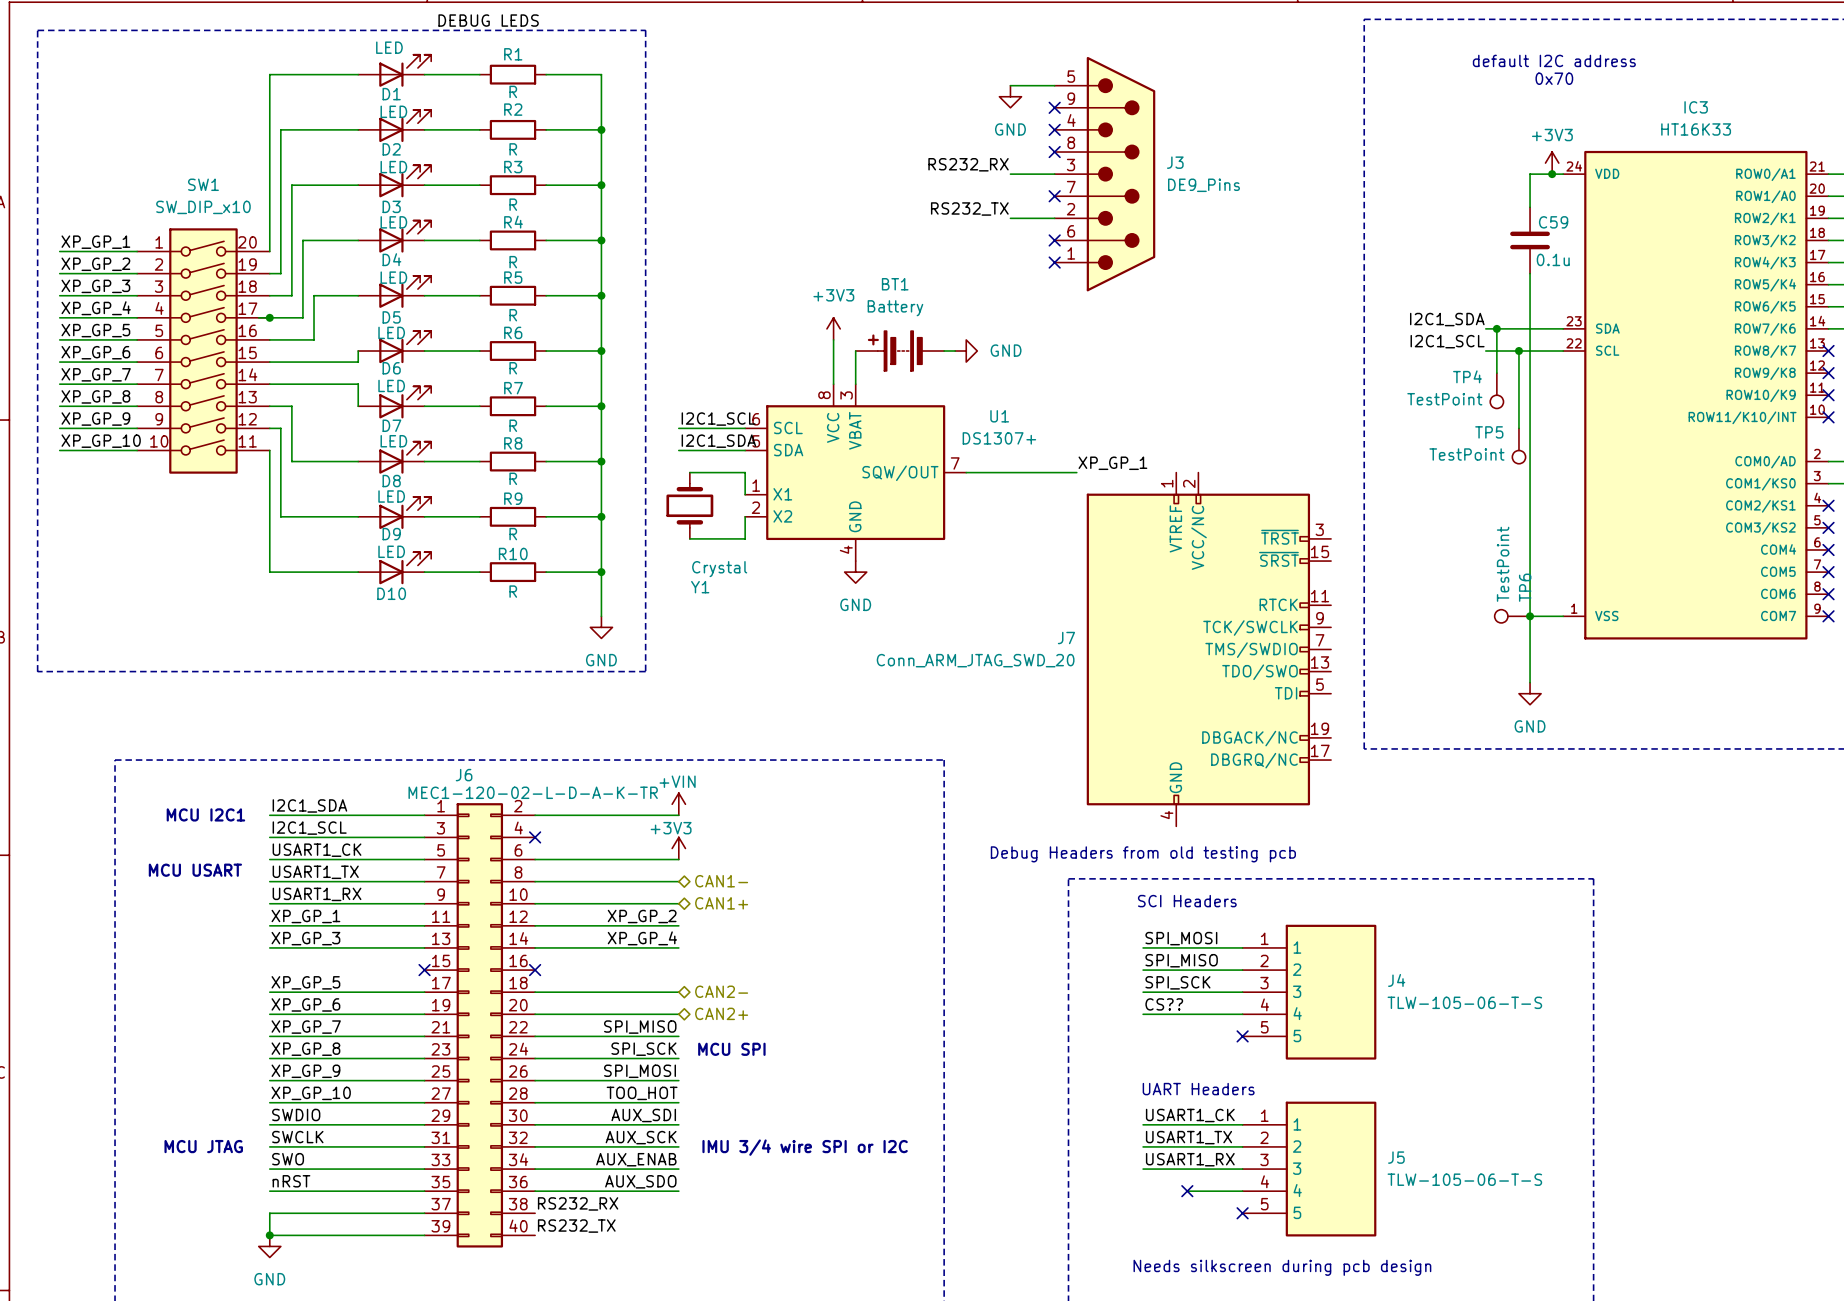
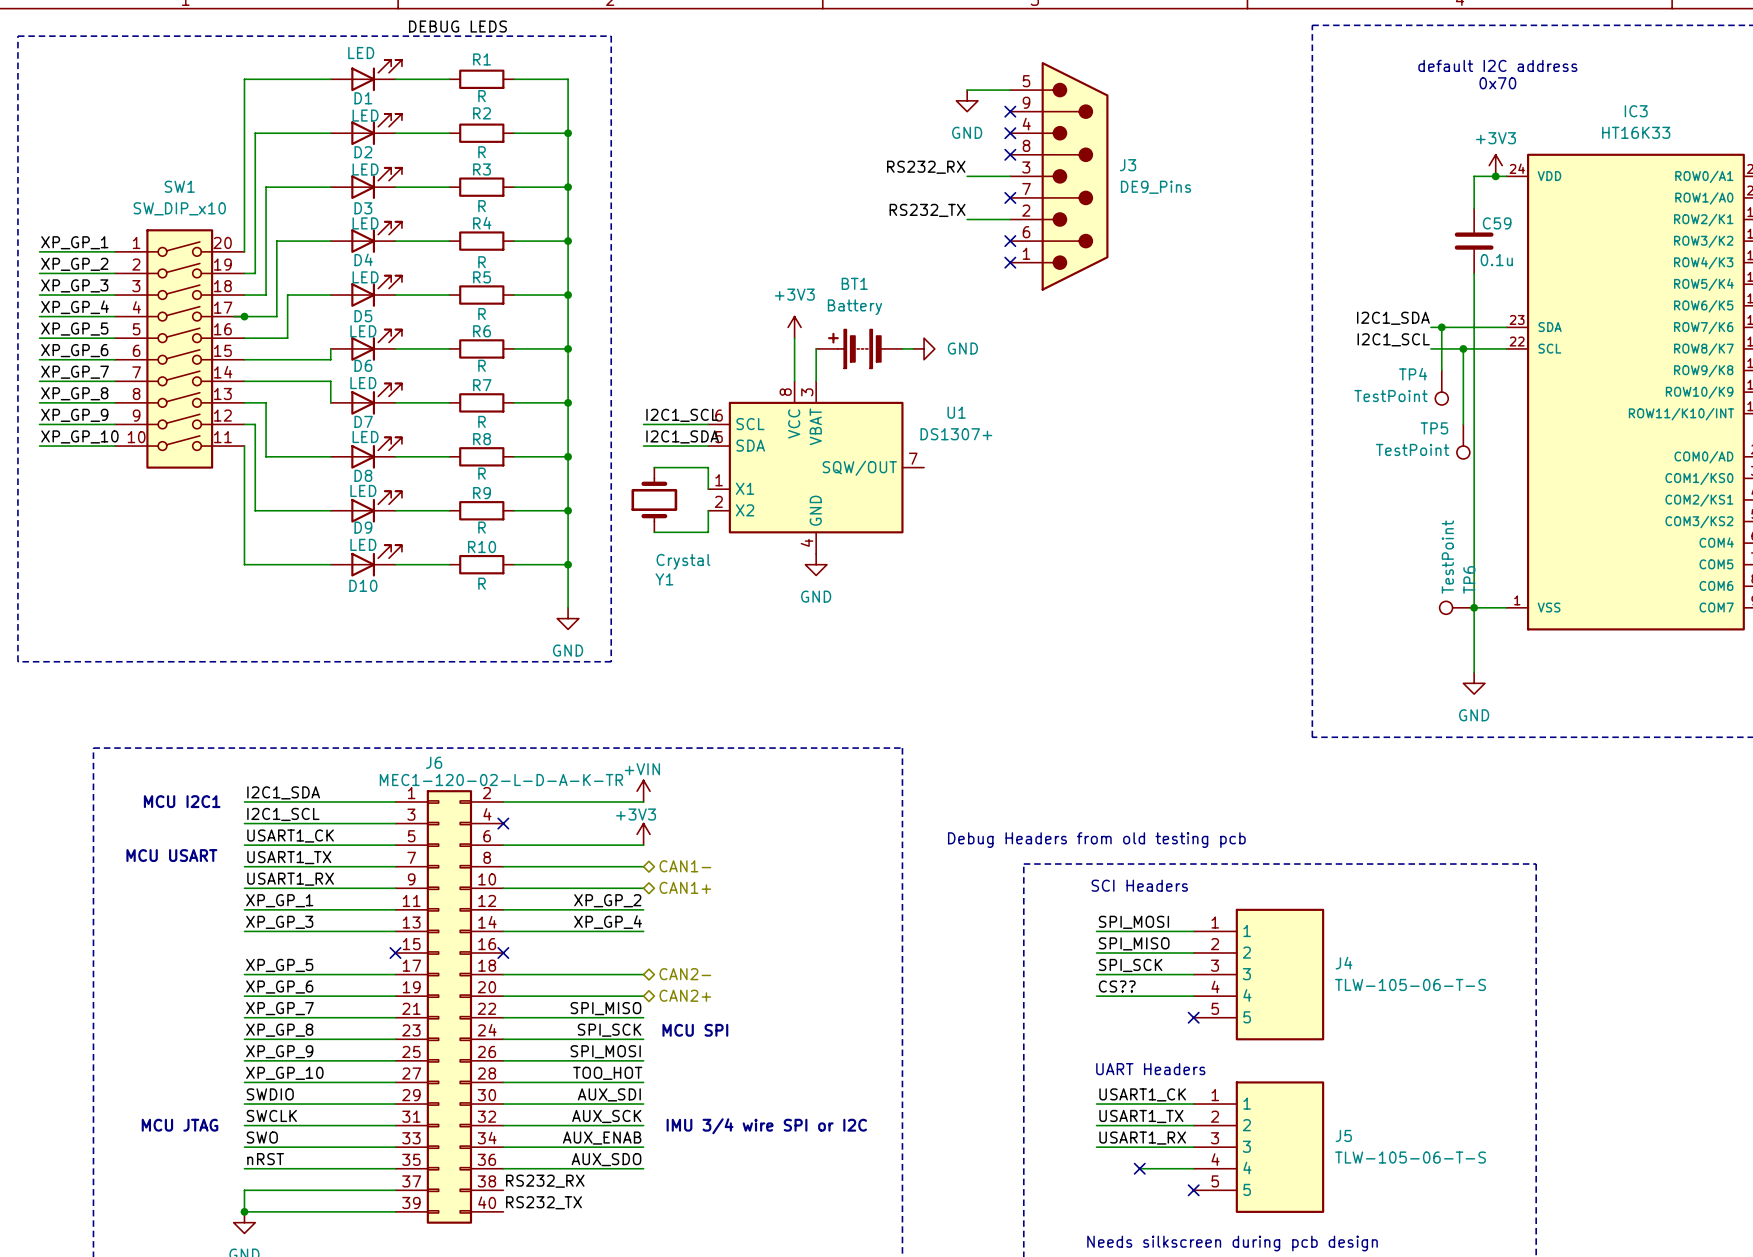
label: XP_GP_1 (1112, 463) -> none
wire: (966, 472) (1076, 472) -> none
J7: Conn_ARM_JTAG_SWD_20 (1208, 649) -> none

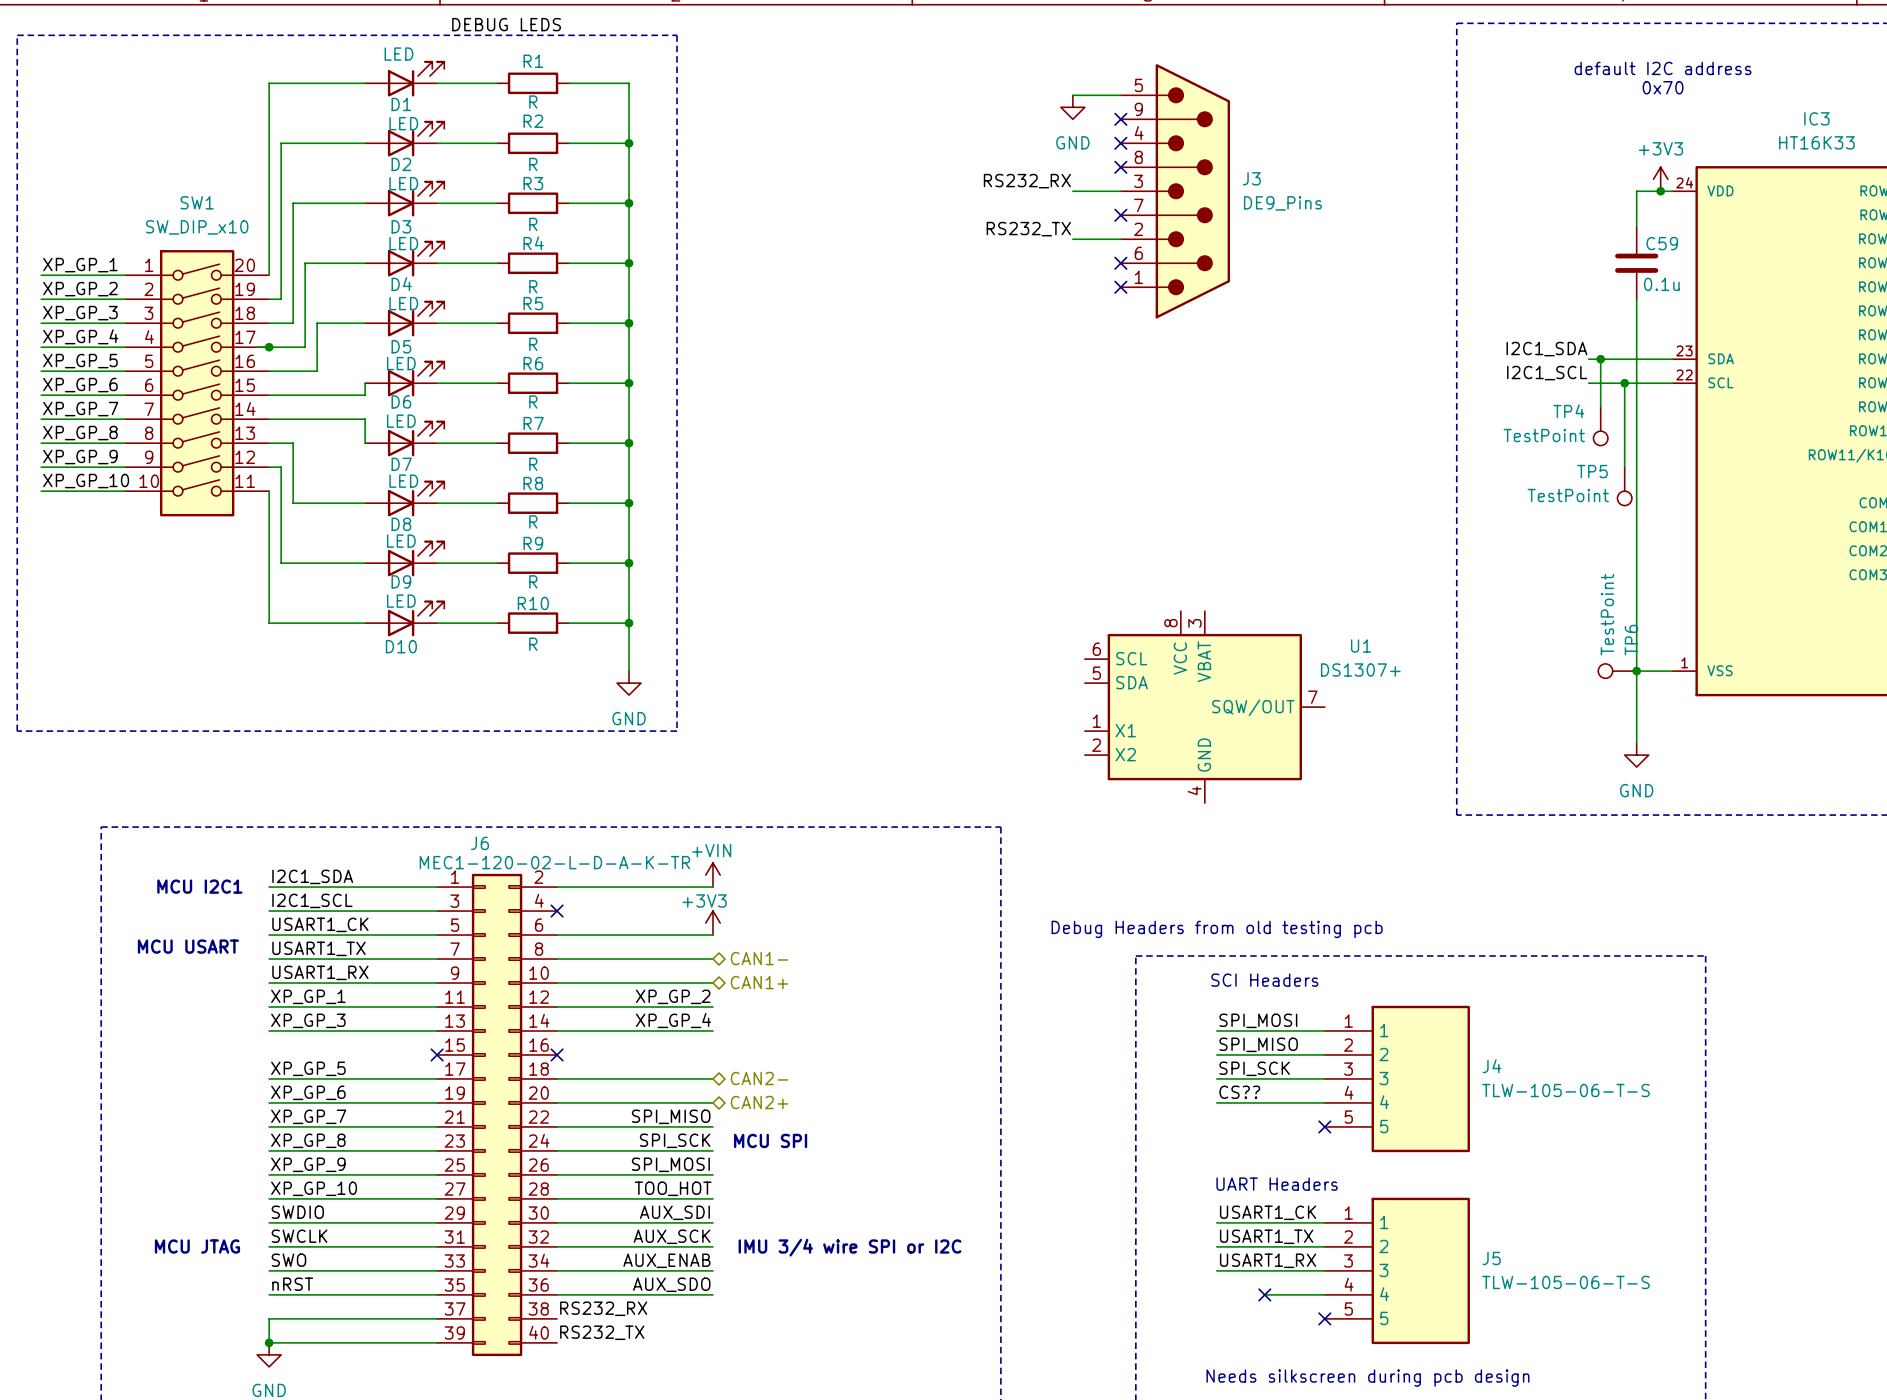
power symbol: +3V3 (794, 327) -> none
wire: (794, 338) (794, 381) -> none
wire: (816, 348) (816, 381) -> none
BT1: Battery (859, 348) -> none
wire: (902, 348) (913, 348) -> none
power symbol: GND (924, 348) -> none
label: I2C1_SCL (682, 415) -> none
wire: (643, 424) (708, 424) -> none
label: I2C1_SDA (682, 436) -> none
wire: (643, 446) (708, 446) -> none
wire: (654, 467) (708, 467) (708, 489) -> none
U1 position: (816, 467) -> (1204, 707)
Y1: Crystal (654, 499) -> none
wire: (708, 510) (708, 532) (654, 532) -> none
power symbol: GND (816, 564) -> none

